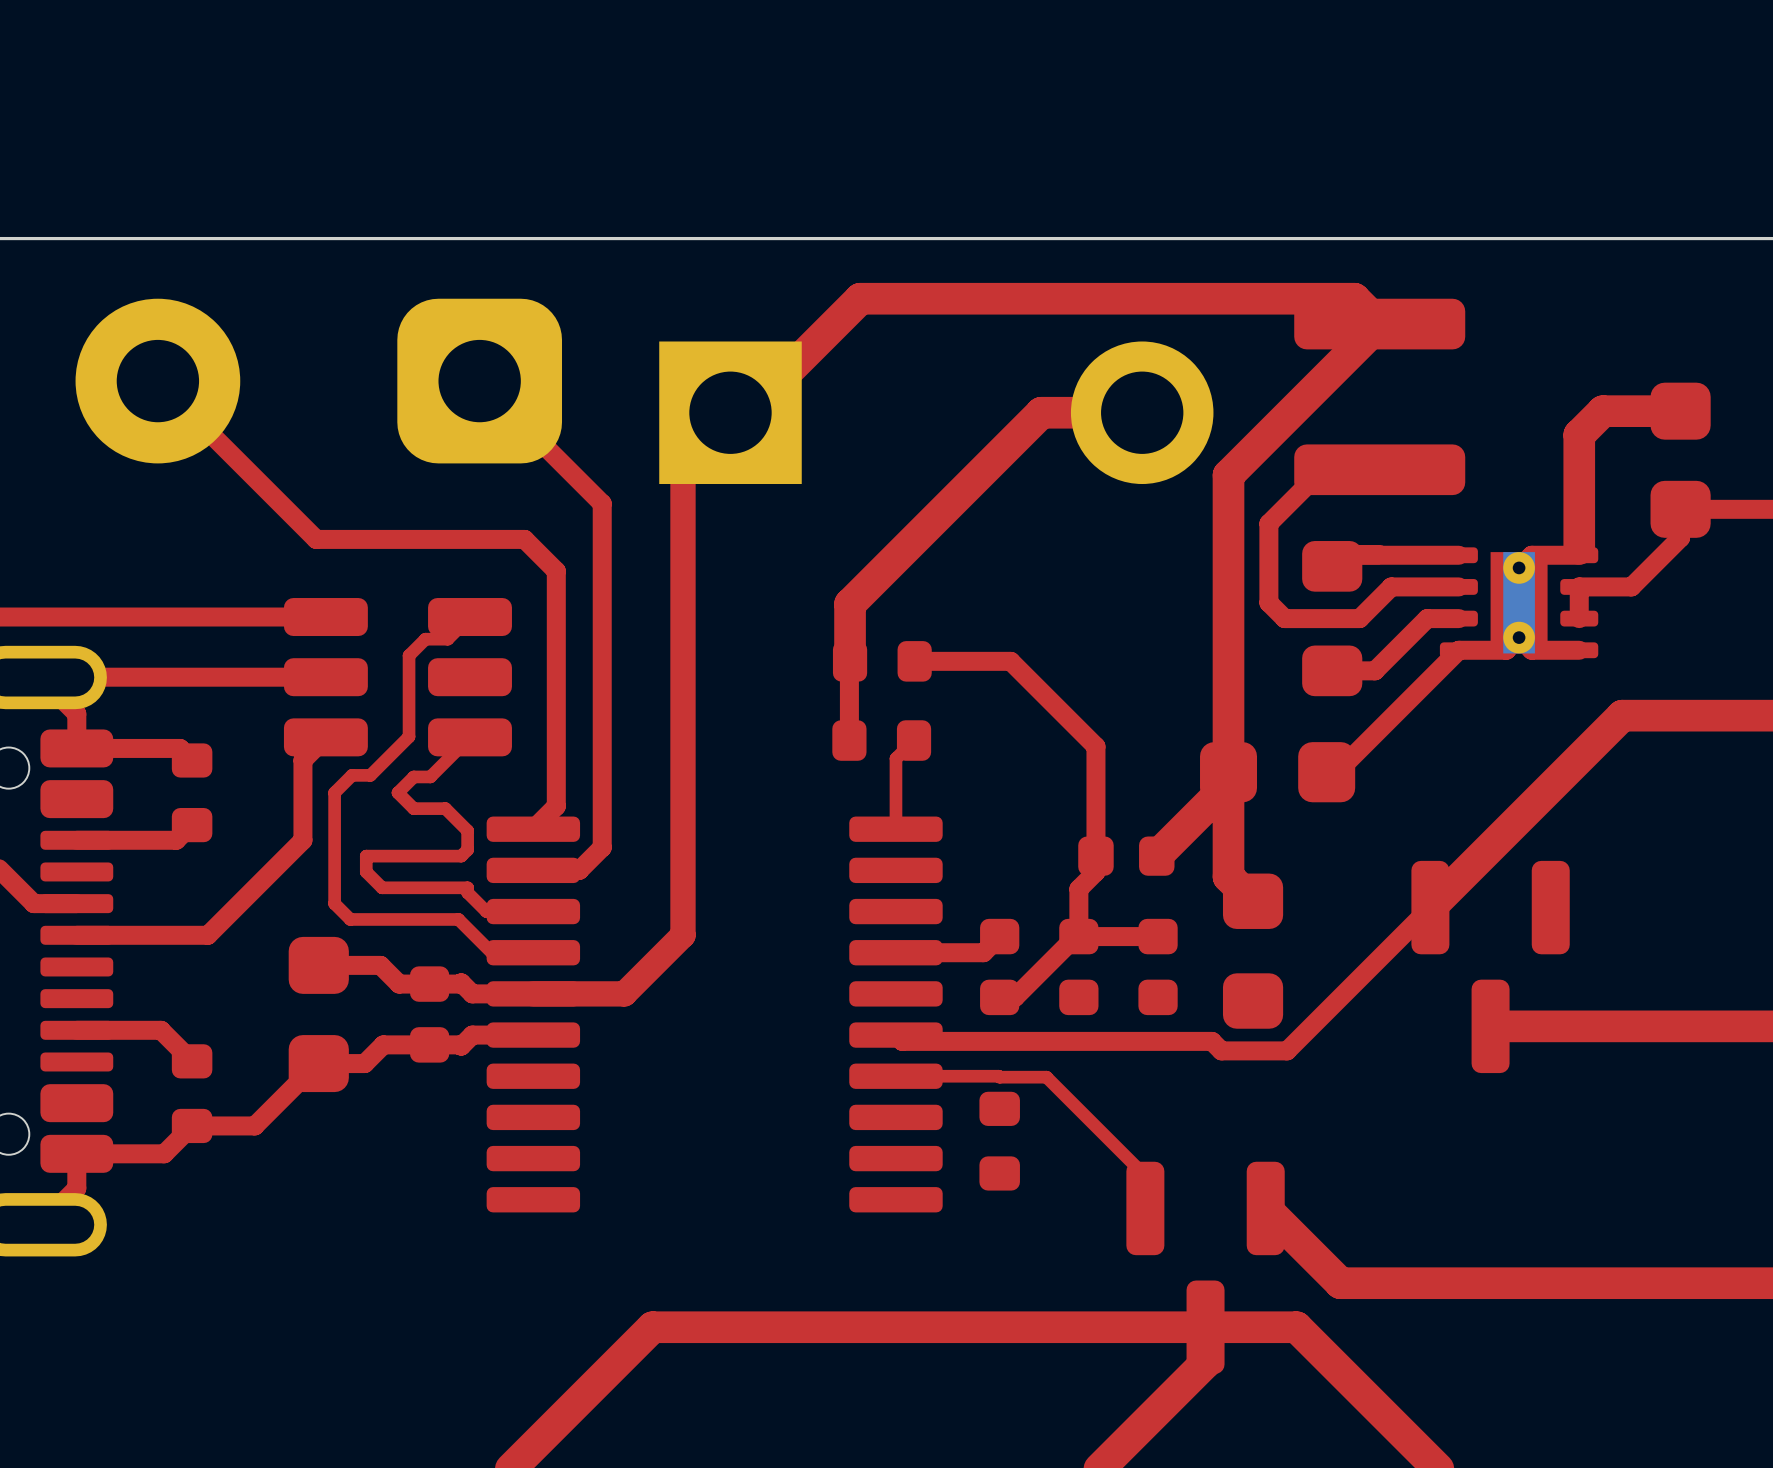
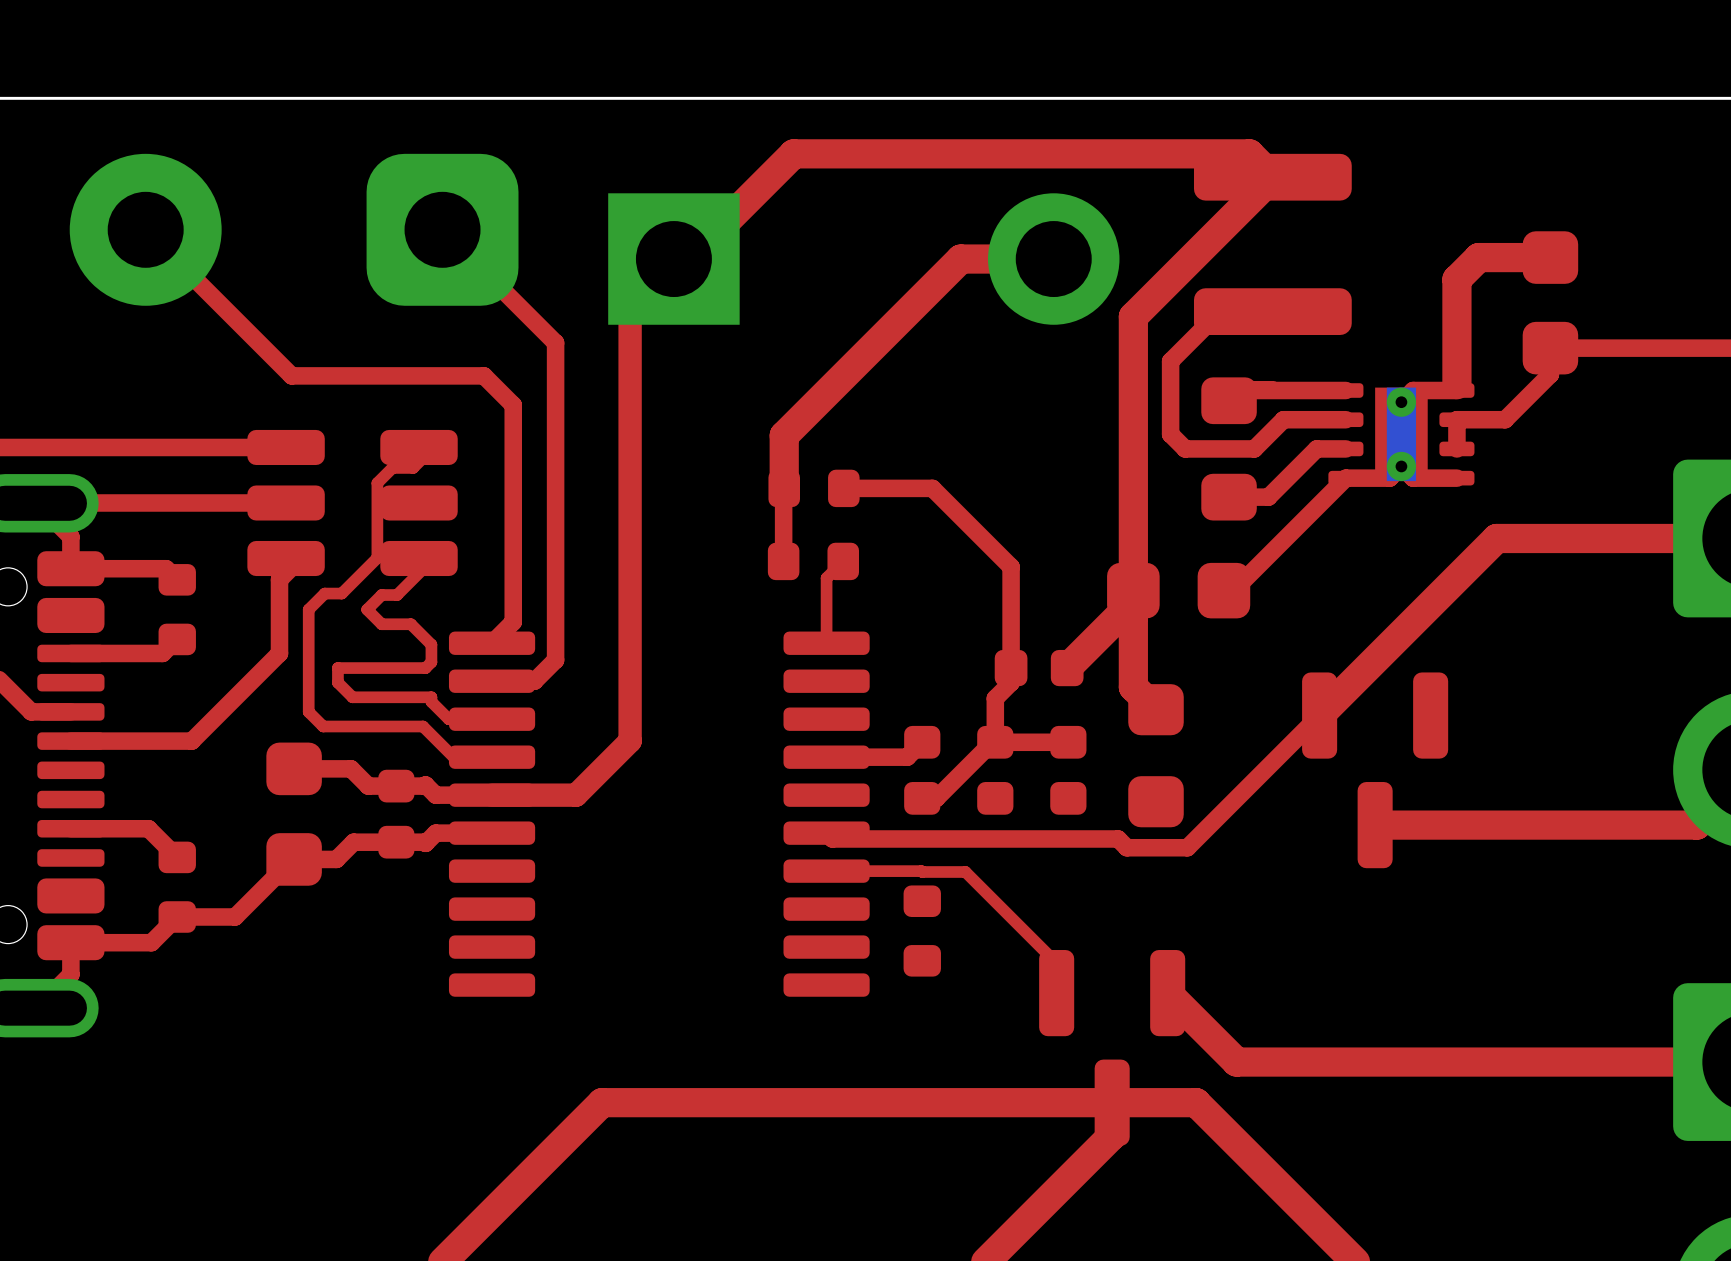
part position: (397, 677) -> (352, 502)

